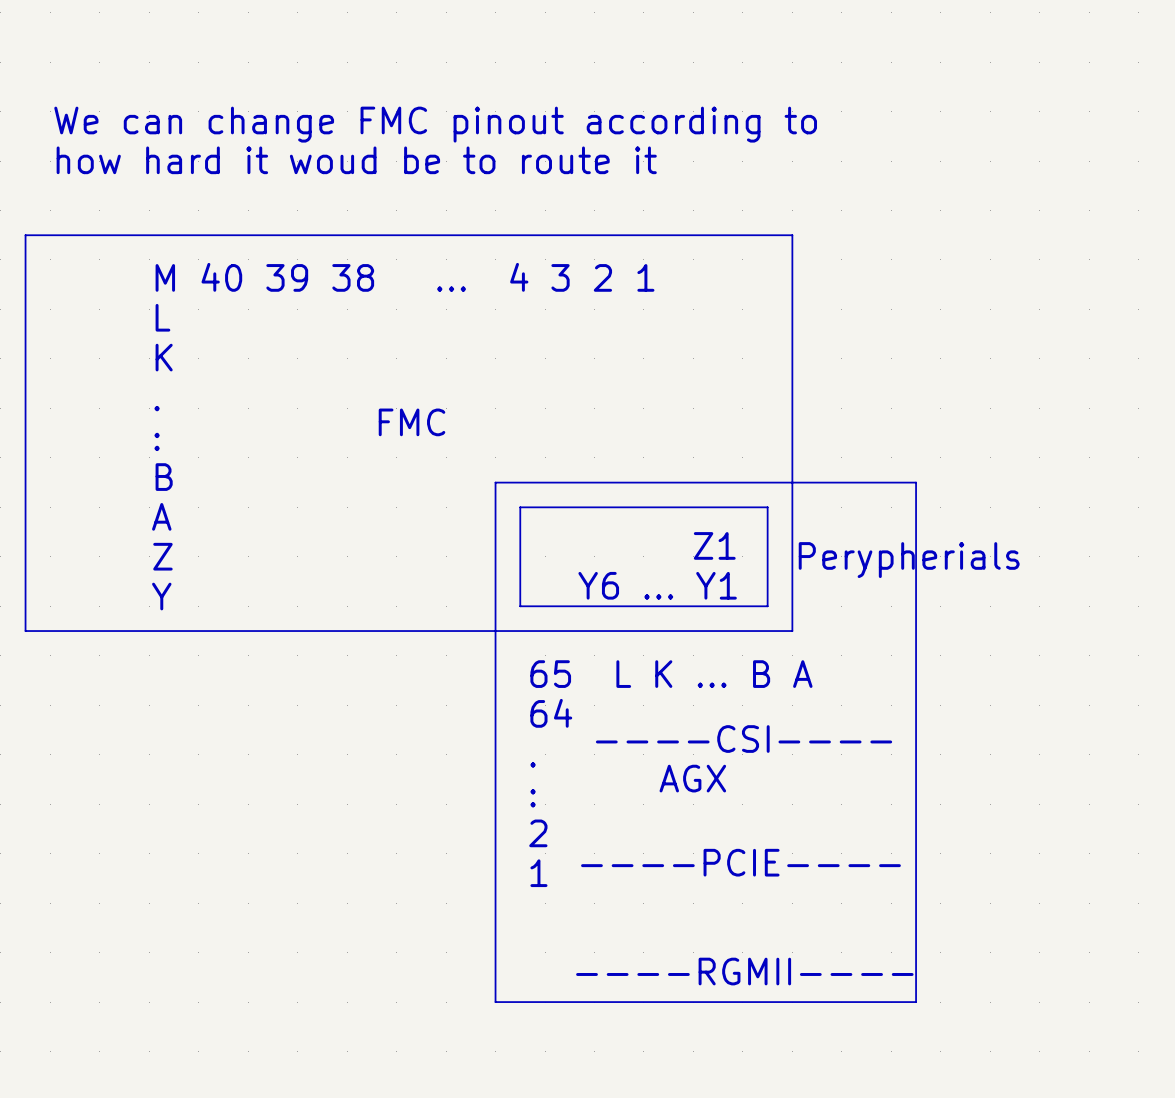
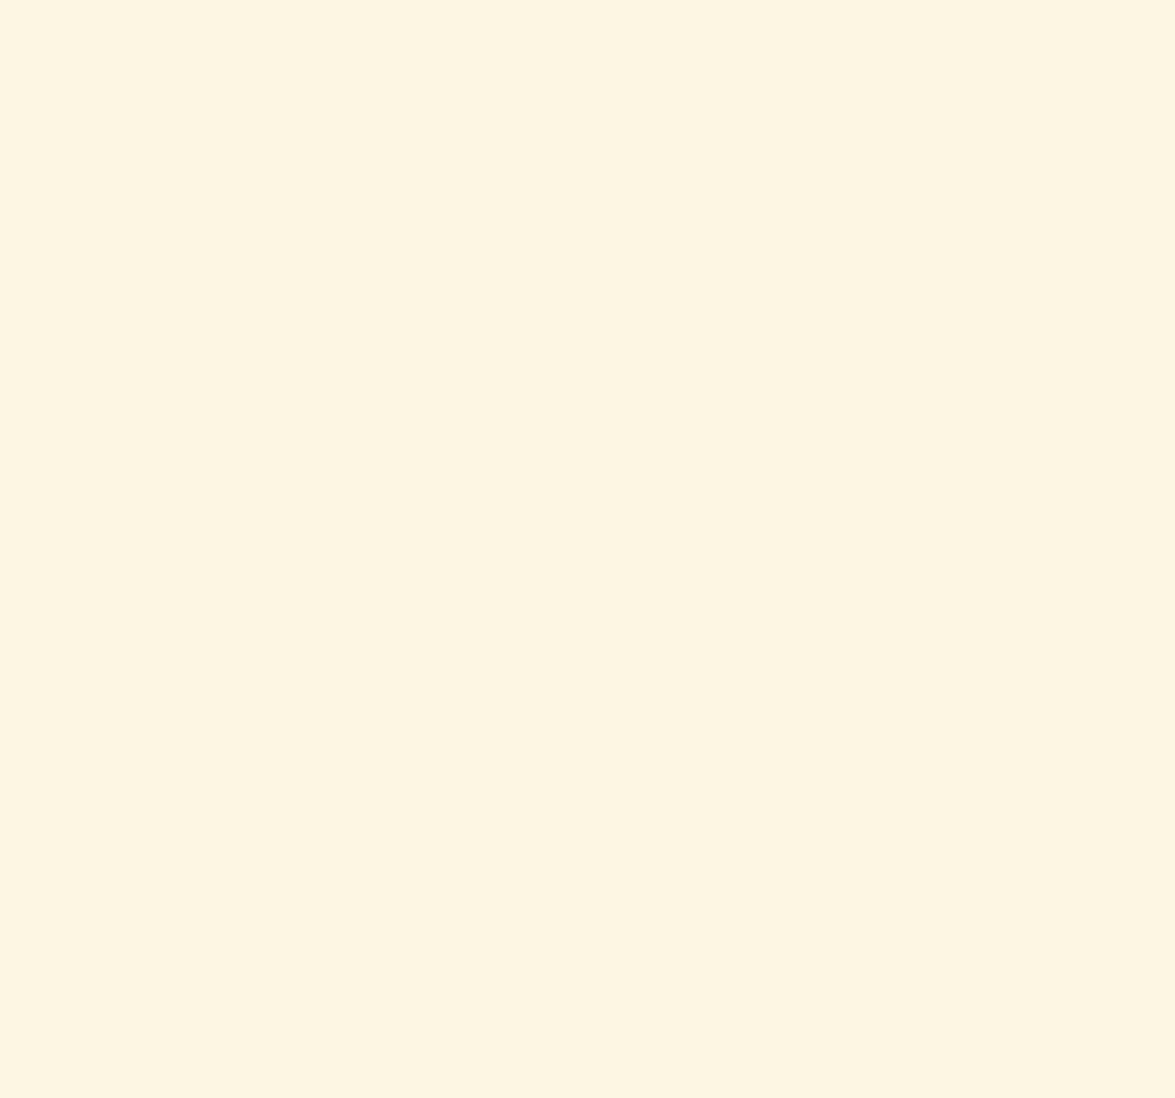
text: We can change FMC pinout according to (435, 124) -> none
text: how hard it woud be to route it (356, 160) -> none
line: (25, 235) (792, 235) (792, 631) (25, 631) (25, 235) -> none
text: M 40 39 38 ... 4 3 2 1 (405, 277) -> none
text: L (162, 317) -> none
text: K (164, 357) -> none
text: . (157, 408) -> none
text: FMC (412, 422) -> none
text: : (157, 441) -> none
text: B (164, 477) -> none
line: (495, 482) (916, 482) (916, 1002) (495, 1002) (495, 482) -> none
line: (520, 507) (767, 507) (767, 606) (520, 606) (520, 507) -> none
text: A (161, 516) -> none
text: Z1 (714, 545) -> none
text: Z (162, 556) -> none
text: Perypherials (909, 560) -> none
text: Y6 ... Y1 (657, 585) -> none
text: Y (161, 596) -> none
text: 65 L K ... B A (671, 674) -> none
text: 64 (551, 713) -> none
text: ----CSI---- (744, 739) -> none
text: . (533, 764) -> none
text: AGX (692, 778) -> none
text: : (533, 798) -> none
text: 2 (538, 833) -> none
text: ----PCIE---- (740, 862) -> none
text: 1 (538, 873) -> none
text: ----RGMII---- (744, 971) -> none

